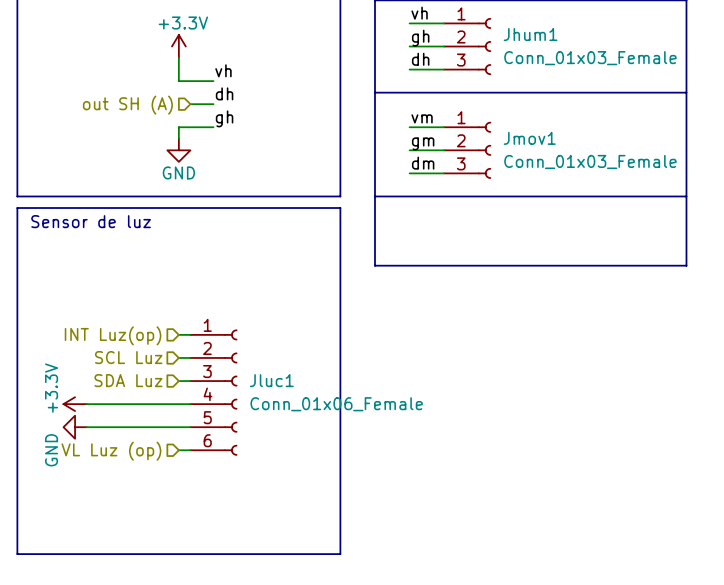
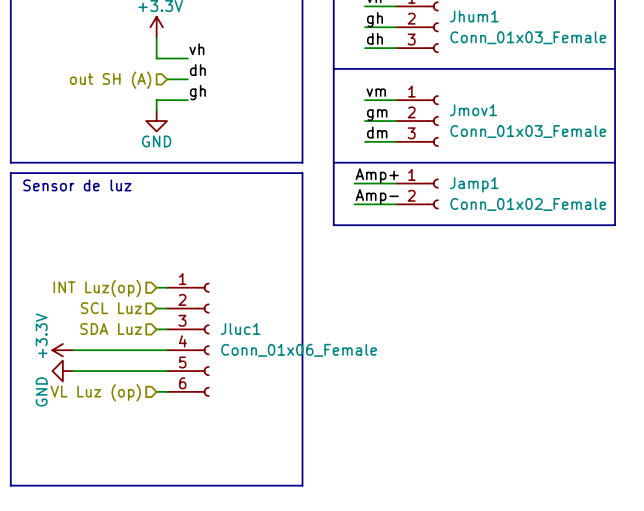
label: none -> Amp+ (377, 175)
wire: none -> (354, 183) (396, 183)
Jamp1: none -> Conn_01x02_Female (417, 193)
label: none -> Amp- (377, 196)
wire: none -> (354, 204) (396, 204)

